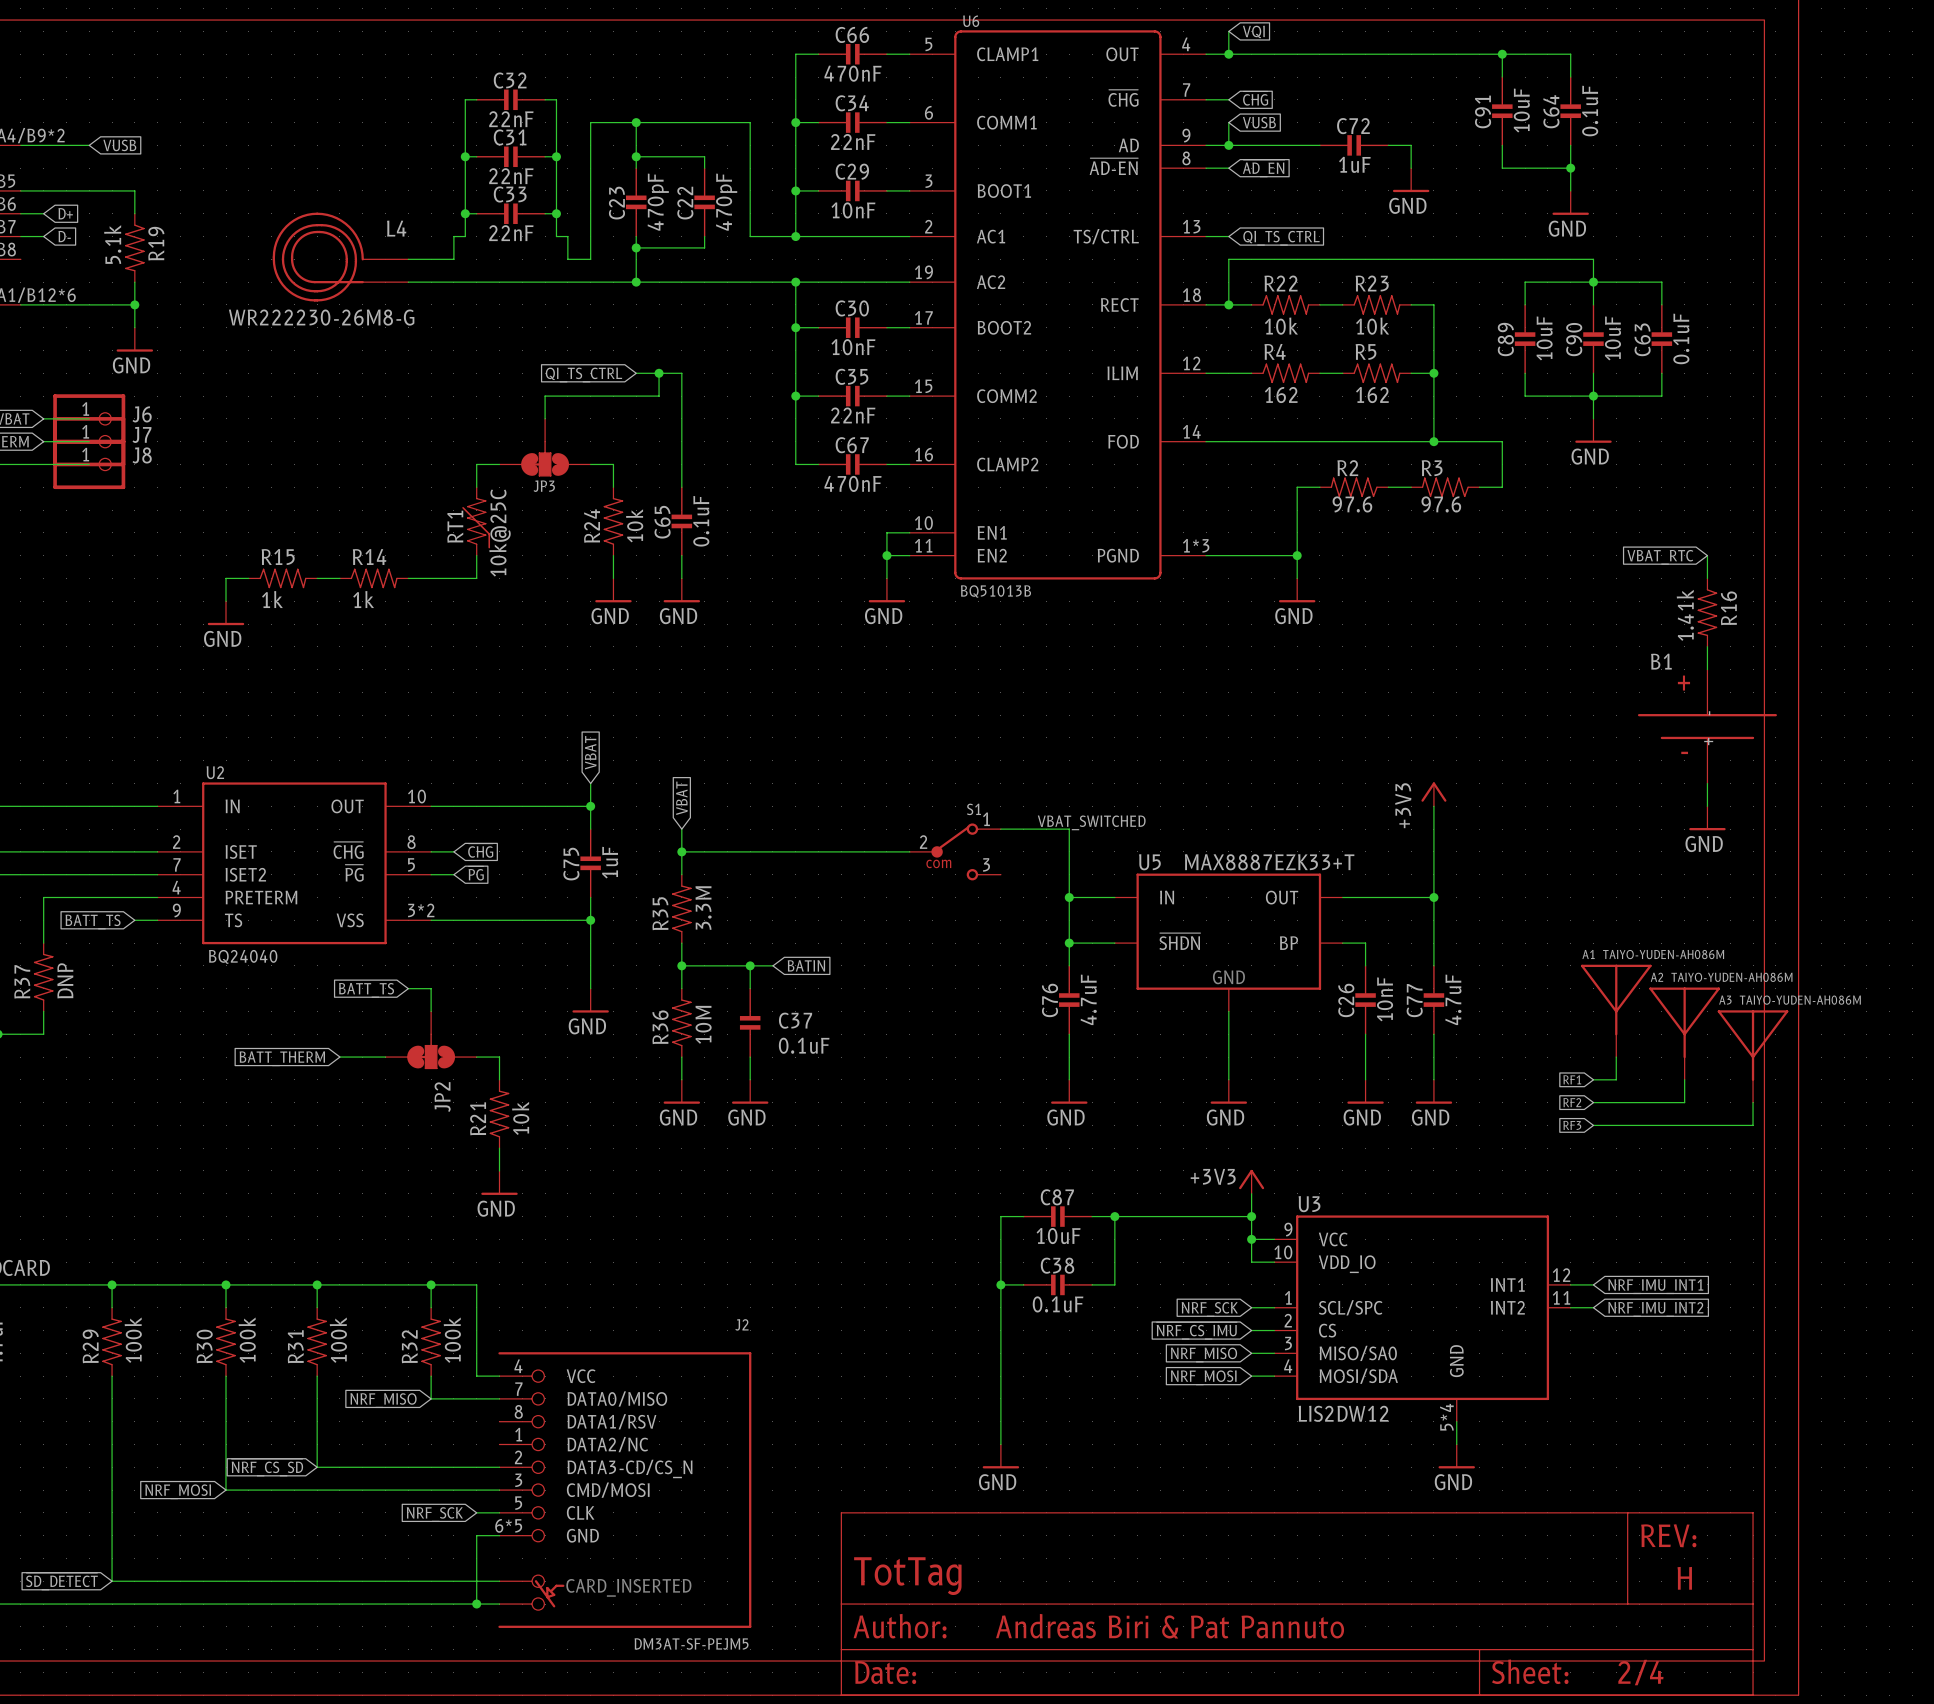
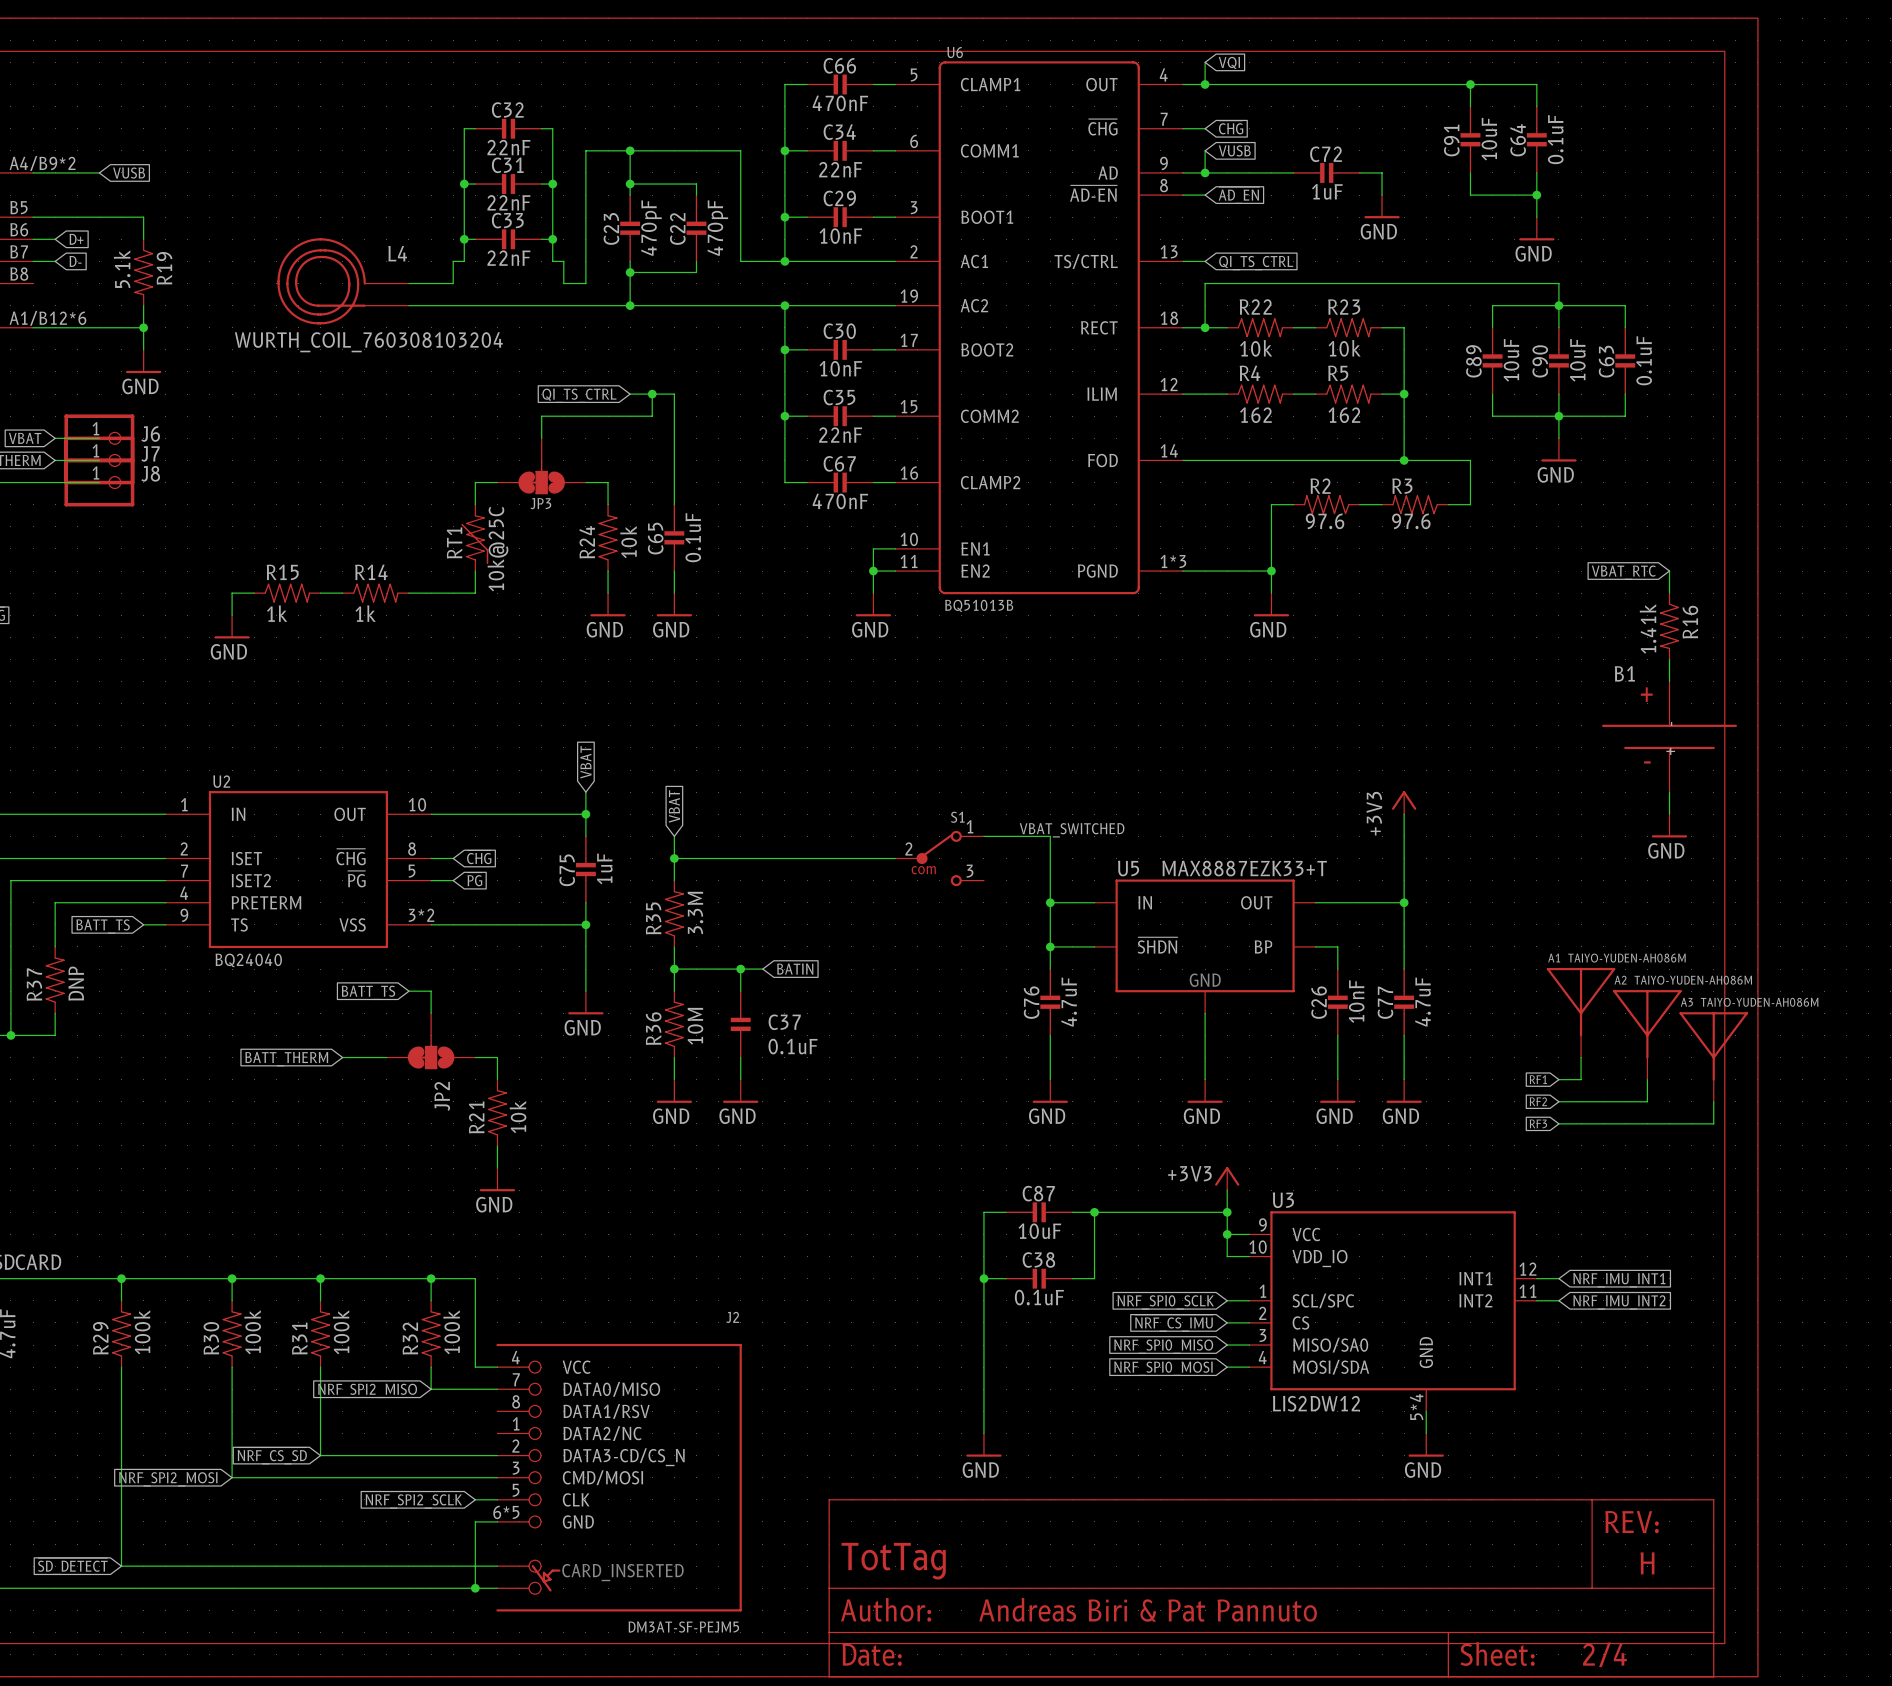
L4 value: WR222230-26M8-G (321, 317) -> WURTH_COIL_760308103204 (368, 342)
global label: NRF_SCK (1209, 1309) -> NRF_SPI0_SCLK (1165, 1302)
global label: NRF_MISO (1204, 1355) -> NRF_SPI0_MISO (1163, 1346)
global label: NRF_MOSI (1203, 1377) -> NRF_SPI0_MOSI (1163, 1368)
global label: NRF_MISO (383, 1400) -> NRF_SPI2_MISO (367, 1390)
global label: NRF_MOSI (178, 1491) -> NRF_SPI2_MOSI (168, 1479)
global label: NRF_SCK (434, 1514) -> NRF_SPI2_SCLK (413, 1501)

